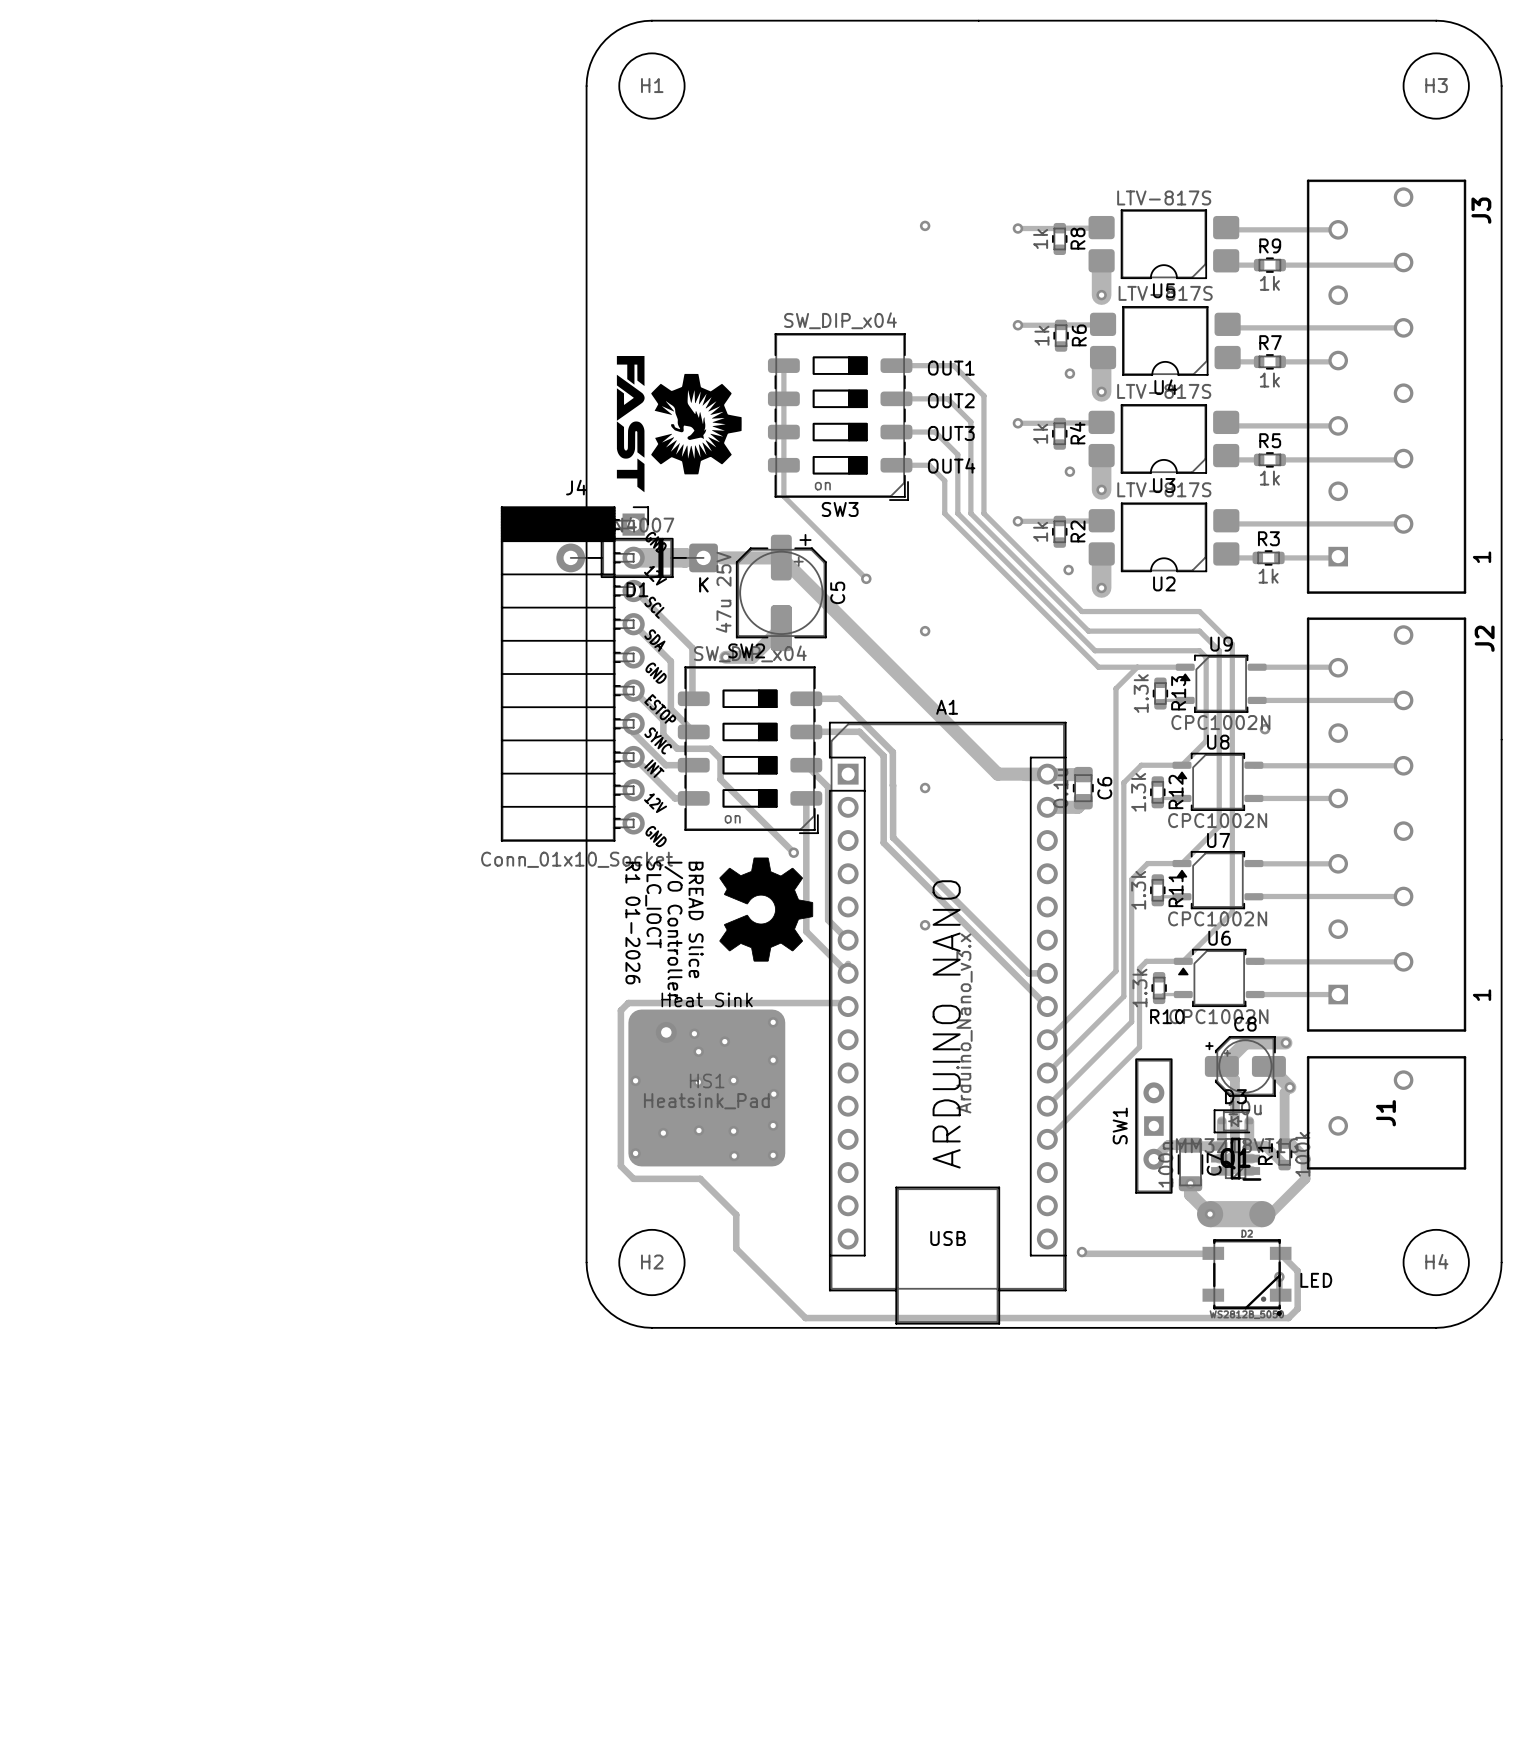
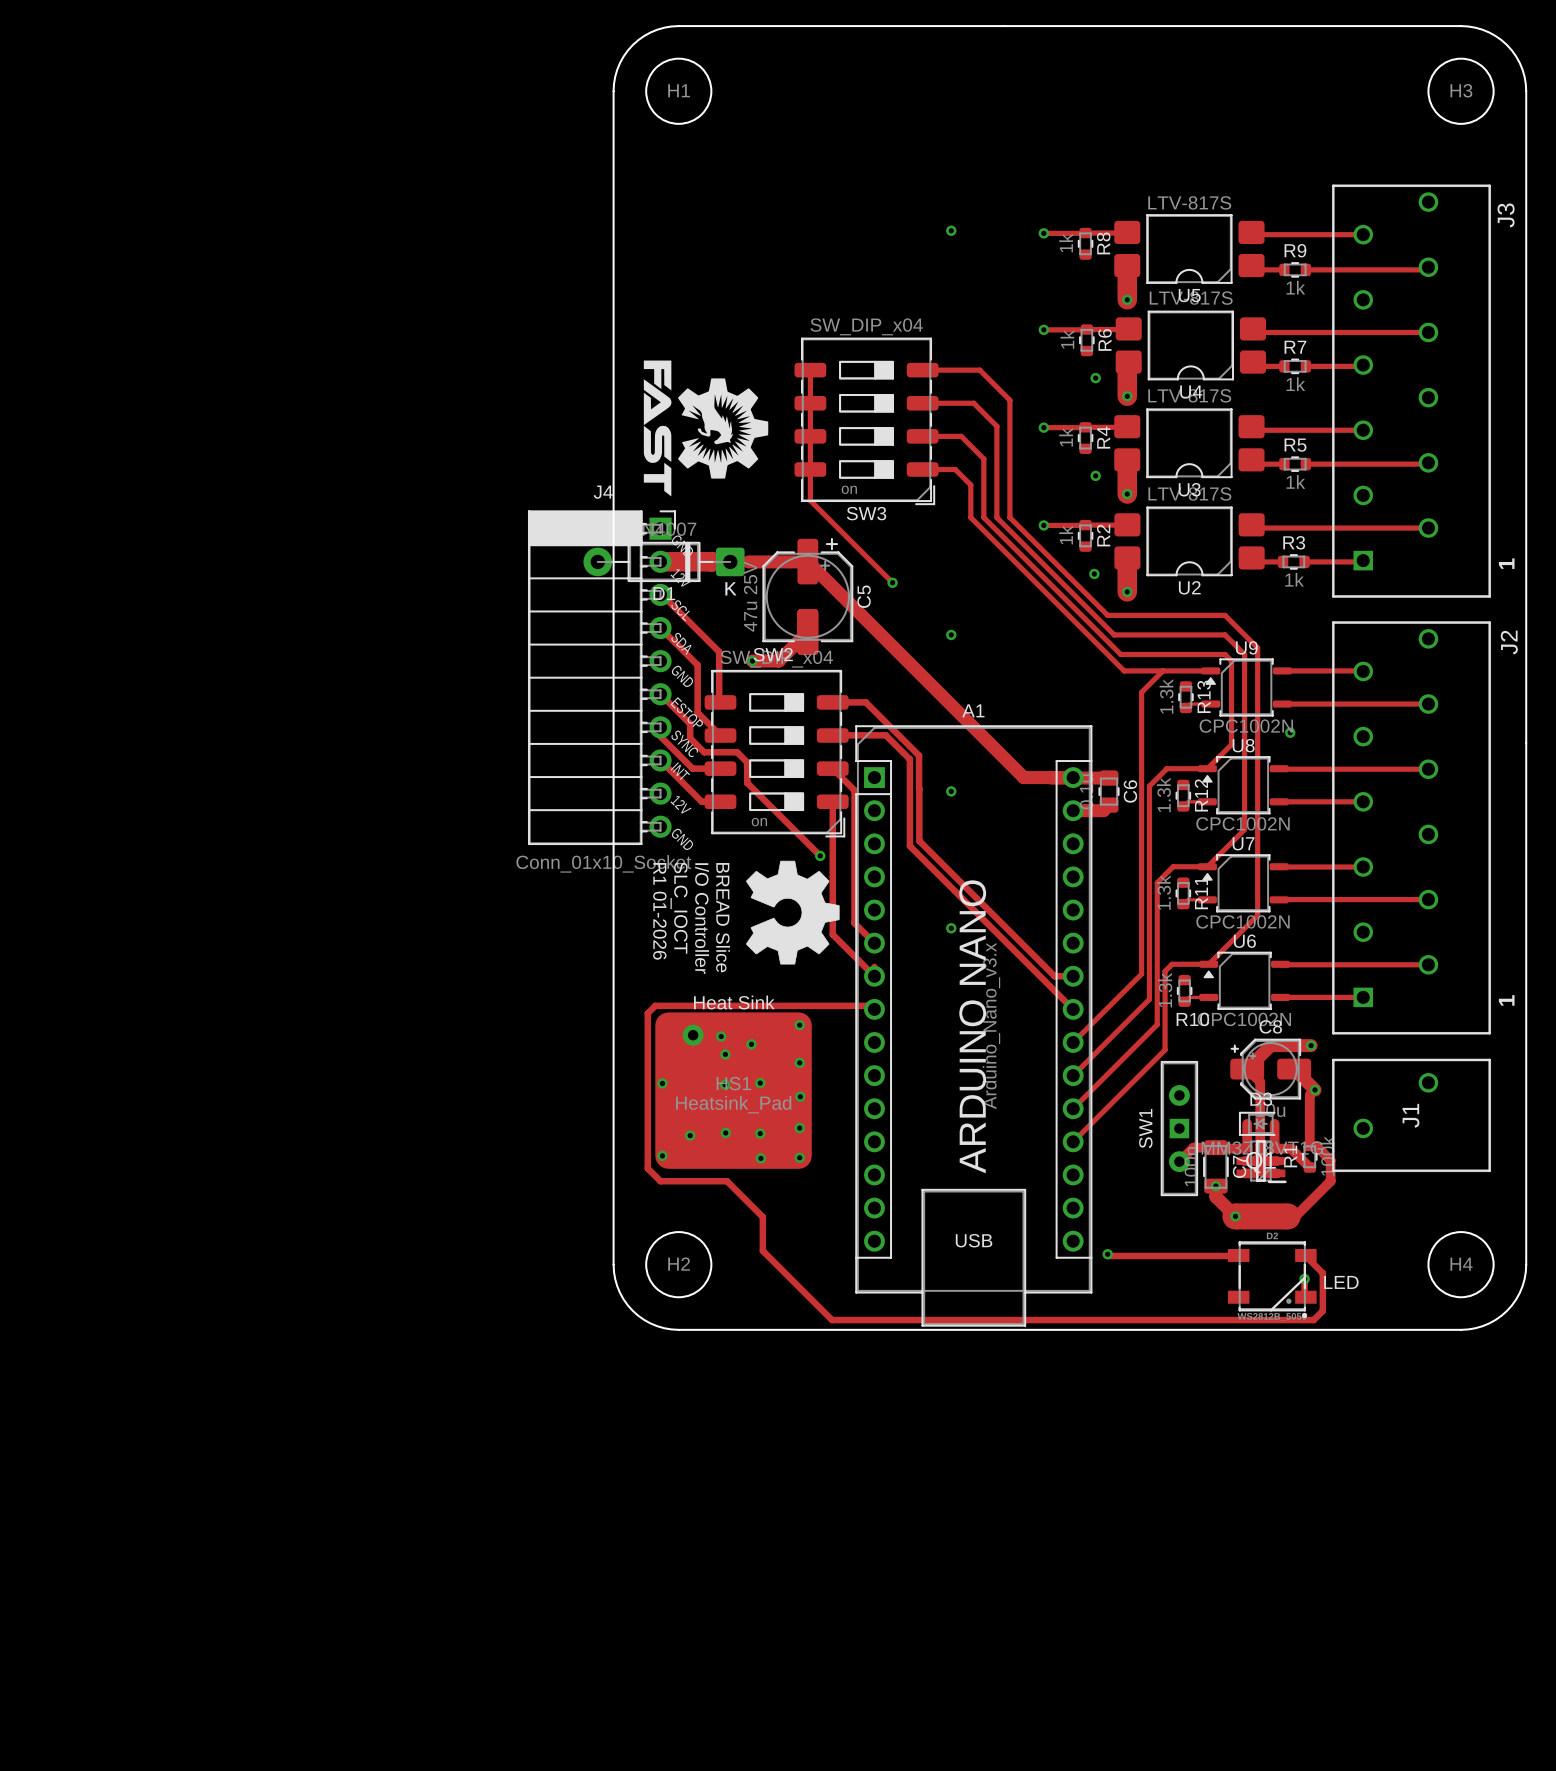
text: OUT1 (951, 368) -> none
text: OUT2 (951, 400) -> none
text: OUT3 (951, 433) -> none
text: OUT4 (951, 465) -> none

